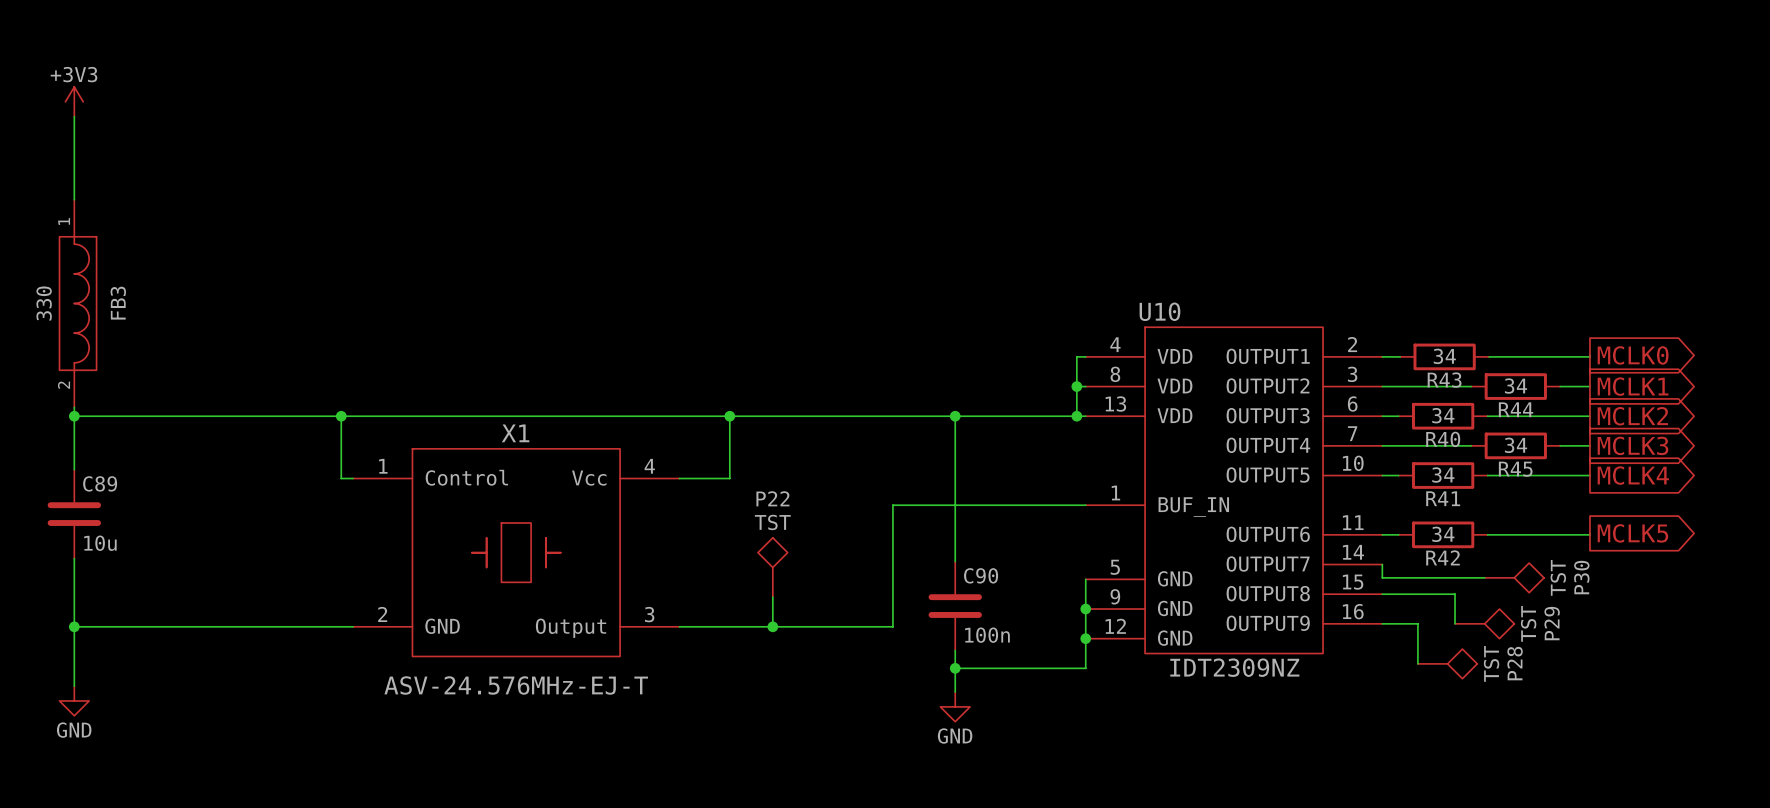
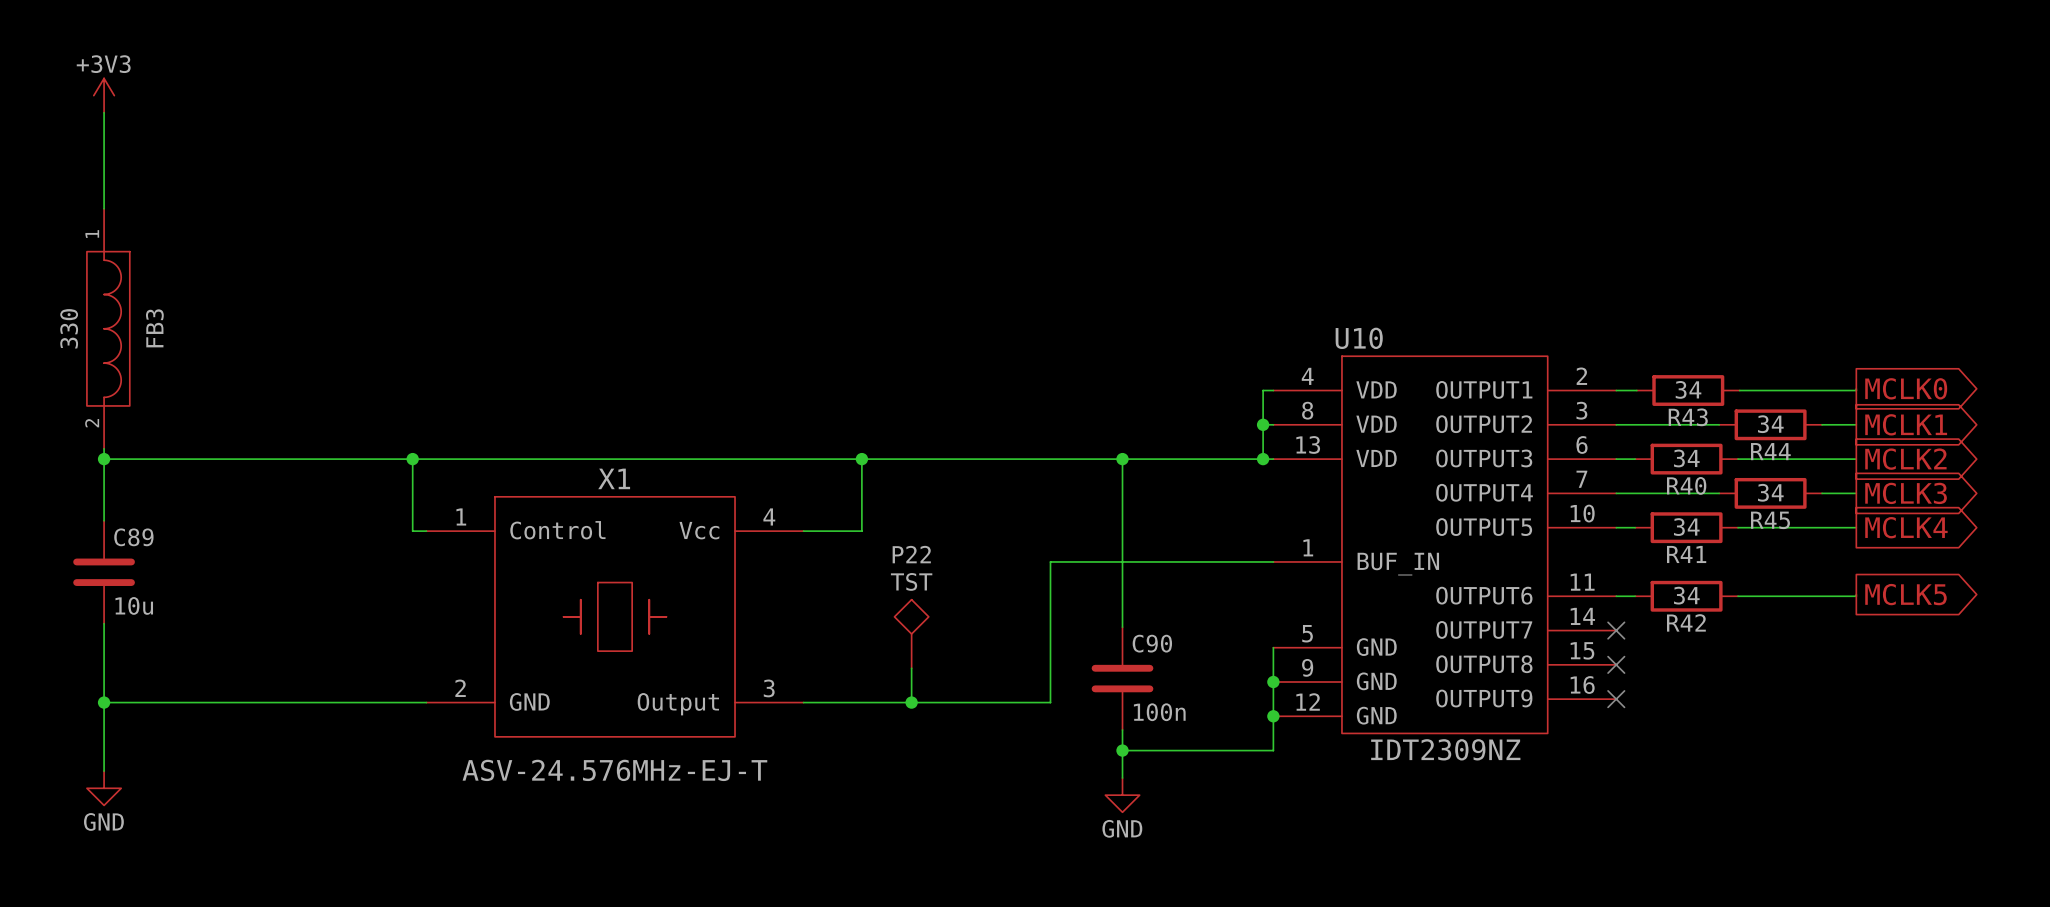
wire: (1382, 564) (1382, 577) (1484, 577) -> none
no-connect mark: none -> (1616, 630)
P30: TST (1514, 577) -> none
wire: (1382, 594) (1455, 594) (1455, 623) -> none
no-connect mark: none -> (1616, 664)
wire: (1382, 623) (1417, 623) (1417, 663) -> none
no-connect mark: none -> (1616, 699)
P29: TST (1484, 623) -> none
P28: TST (1447, 663) -> none

